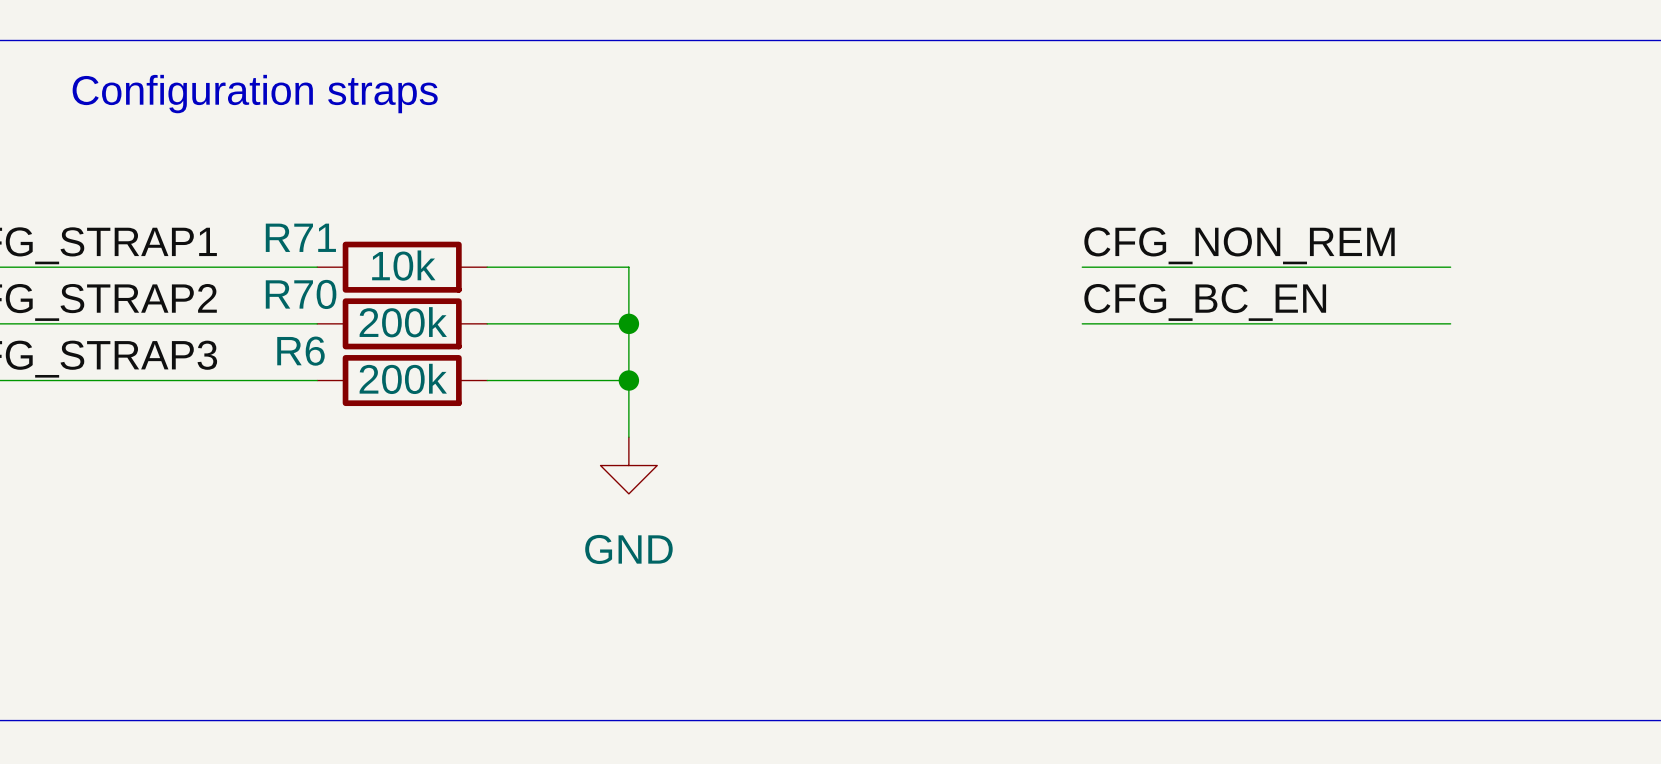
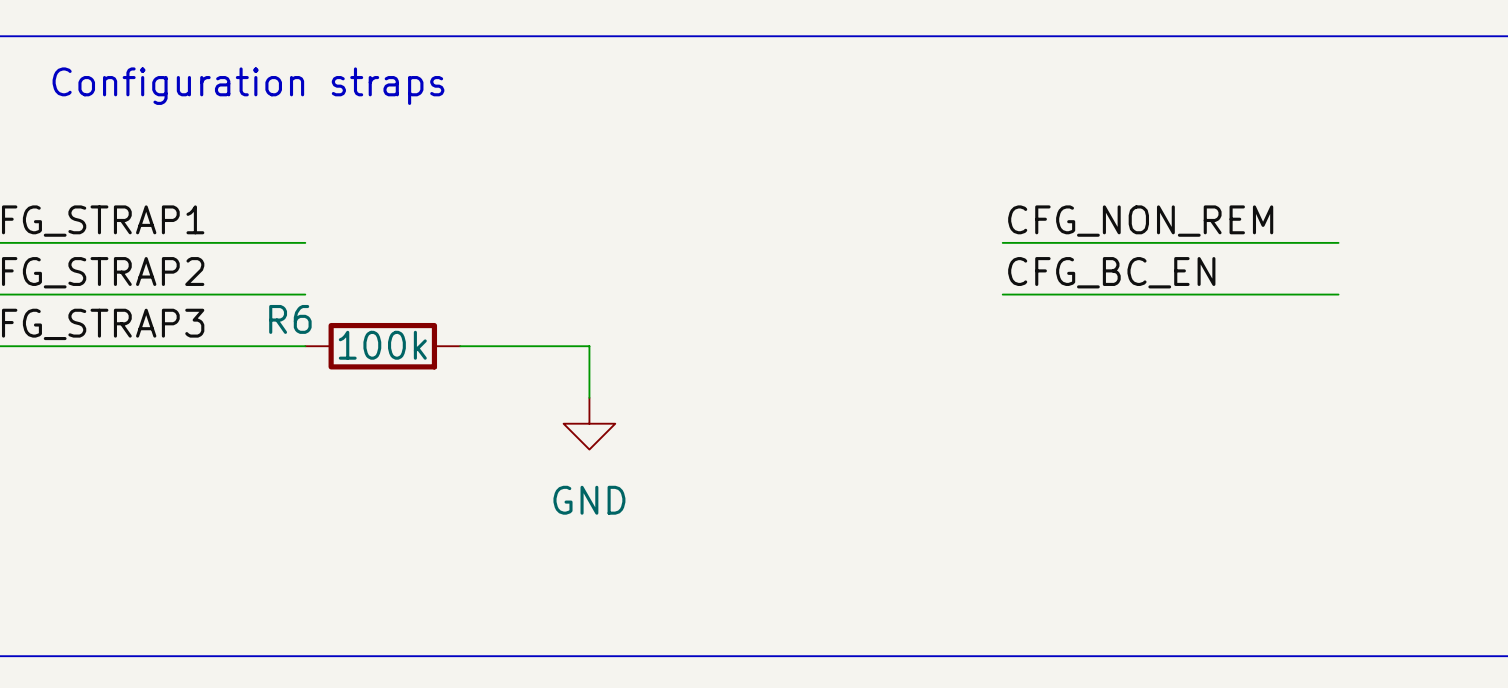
R71: 10k (402, 267) -> none
wire: (487, 267) (628, 267) (628, 380) -> none
R70: 200k (402, 323) -> none
wire: (487, 323) (628, 323) -> none
junction: (628, 323) -> none
R6 value: 200k (403, 378) -> 100k (382, 345)
junction: (628, 380) -> none

